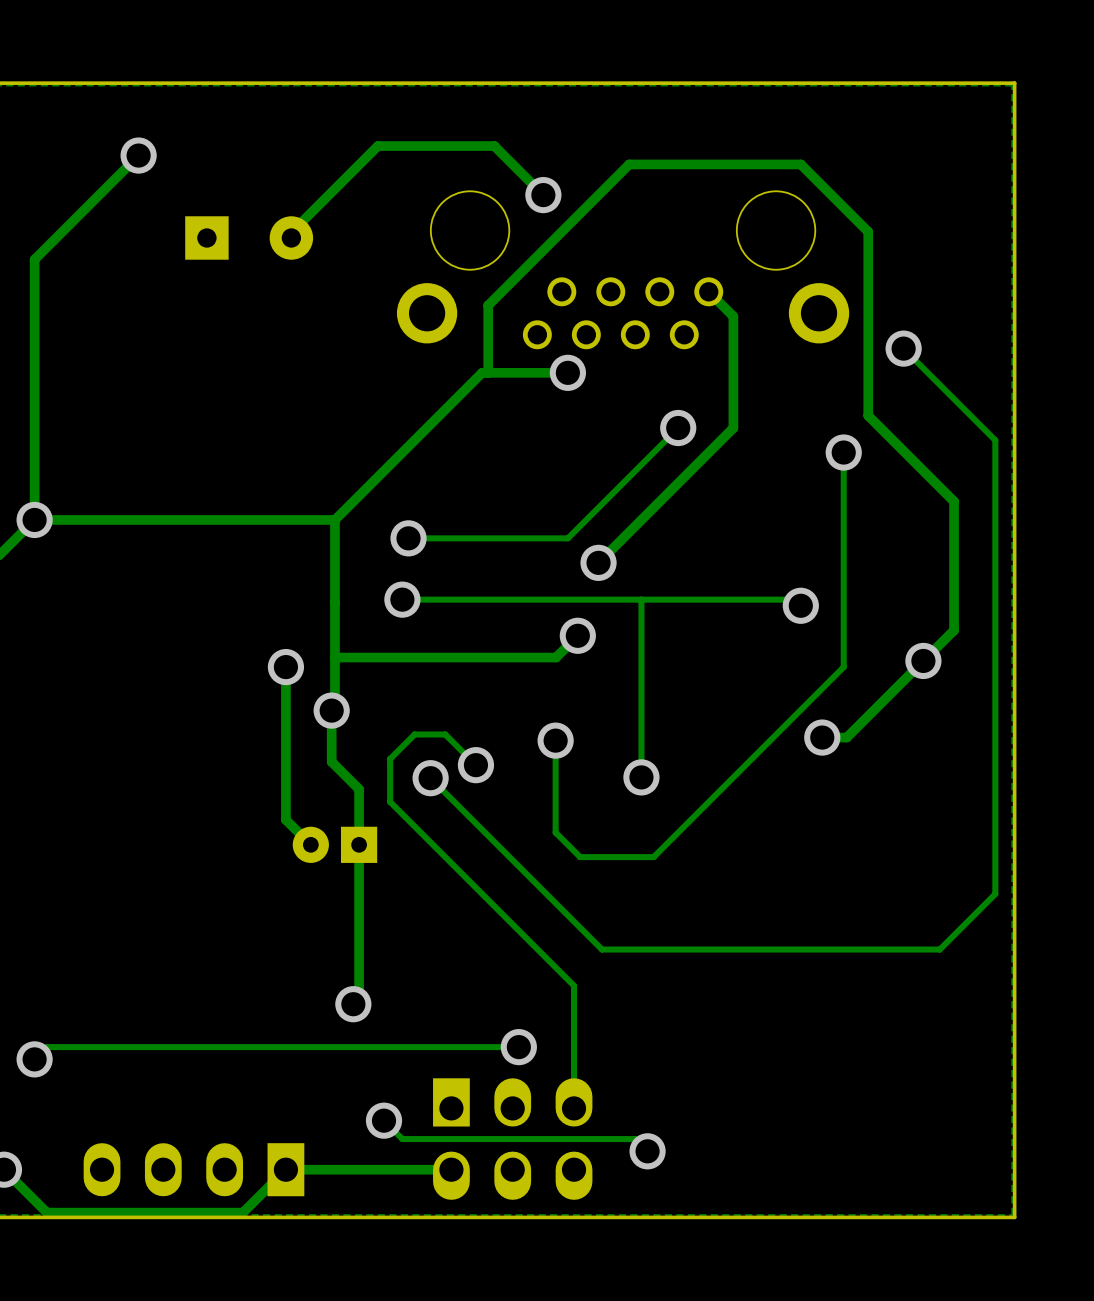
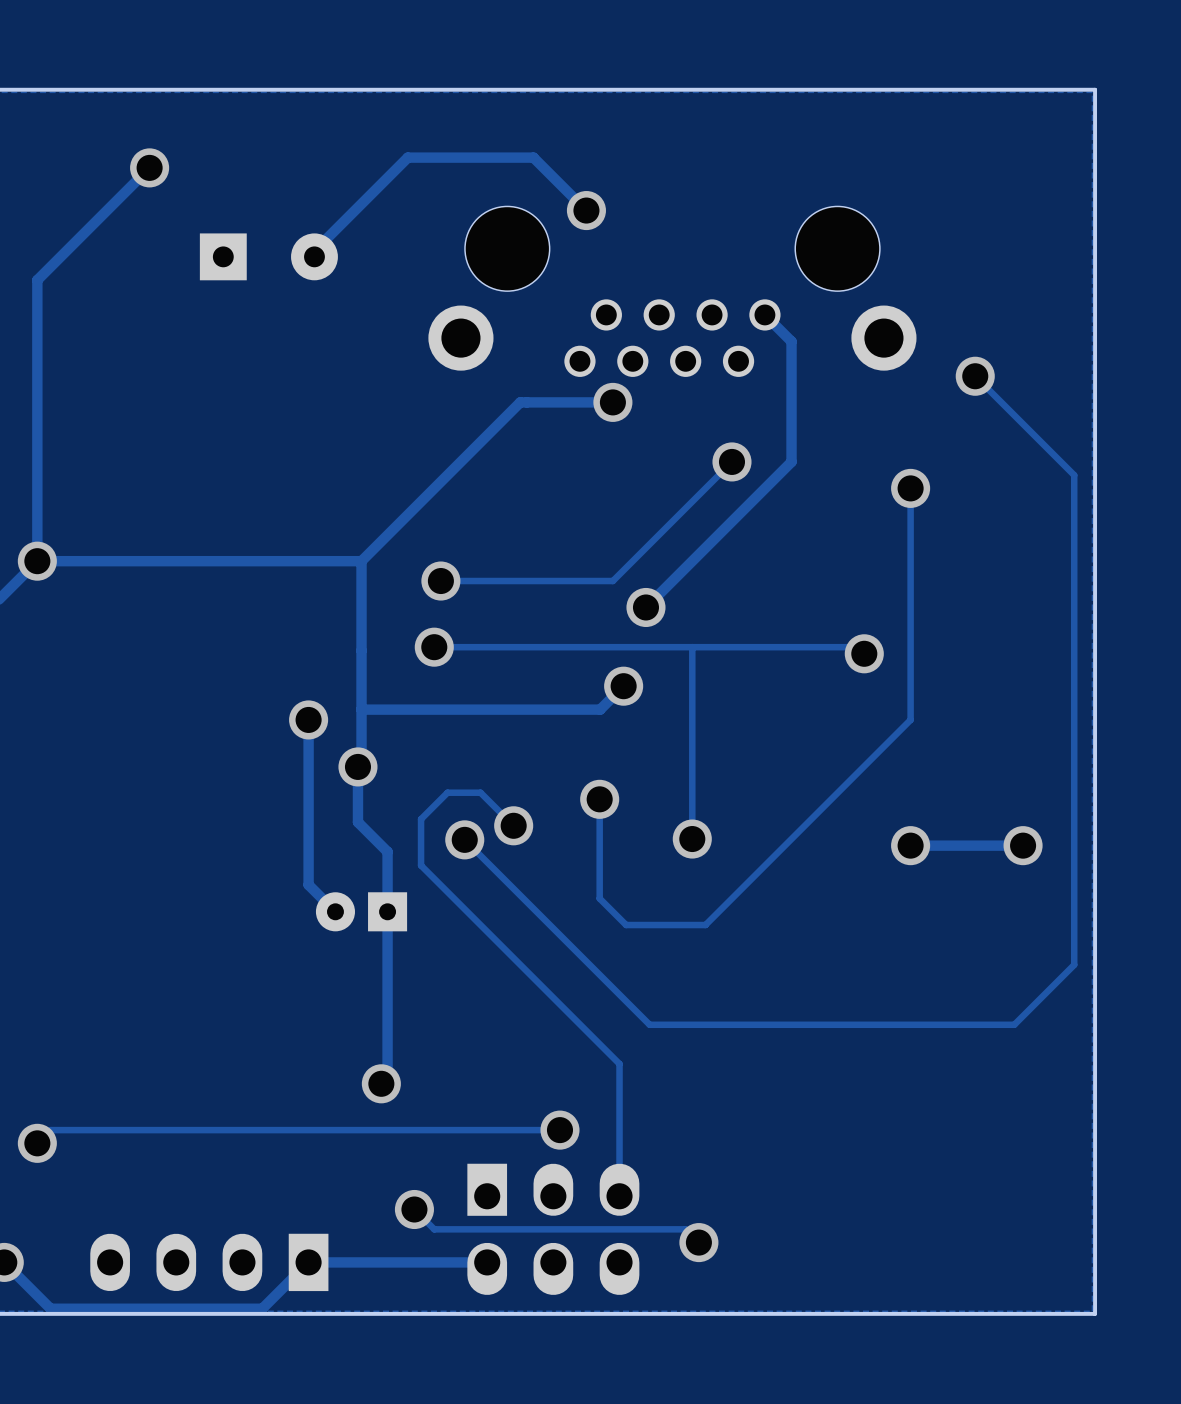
track: (488, 372) (488, 305) (629, 164) (800, 164) (868, 231) (868, 415) (954, 501) (954, 630) (846, 737) (822, 737) -> none
via: (923, 660) -> none
via position: (822, 737) -> (910, 845)
track: none -> (1023, 845) (910, 845)
via: none -> (1023, 845)

